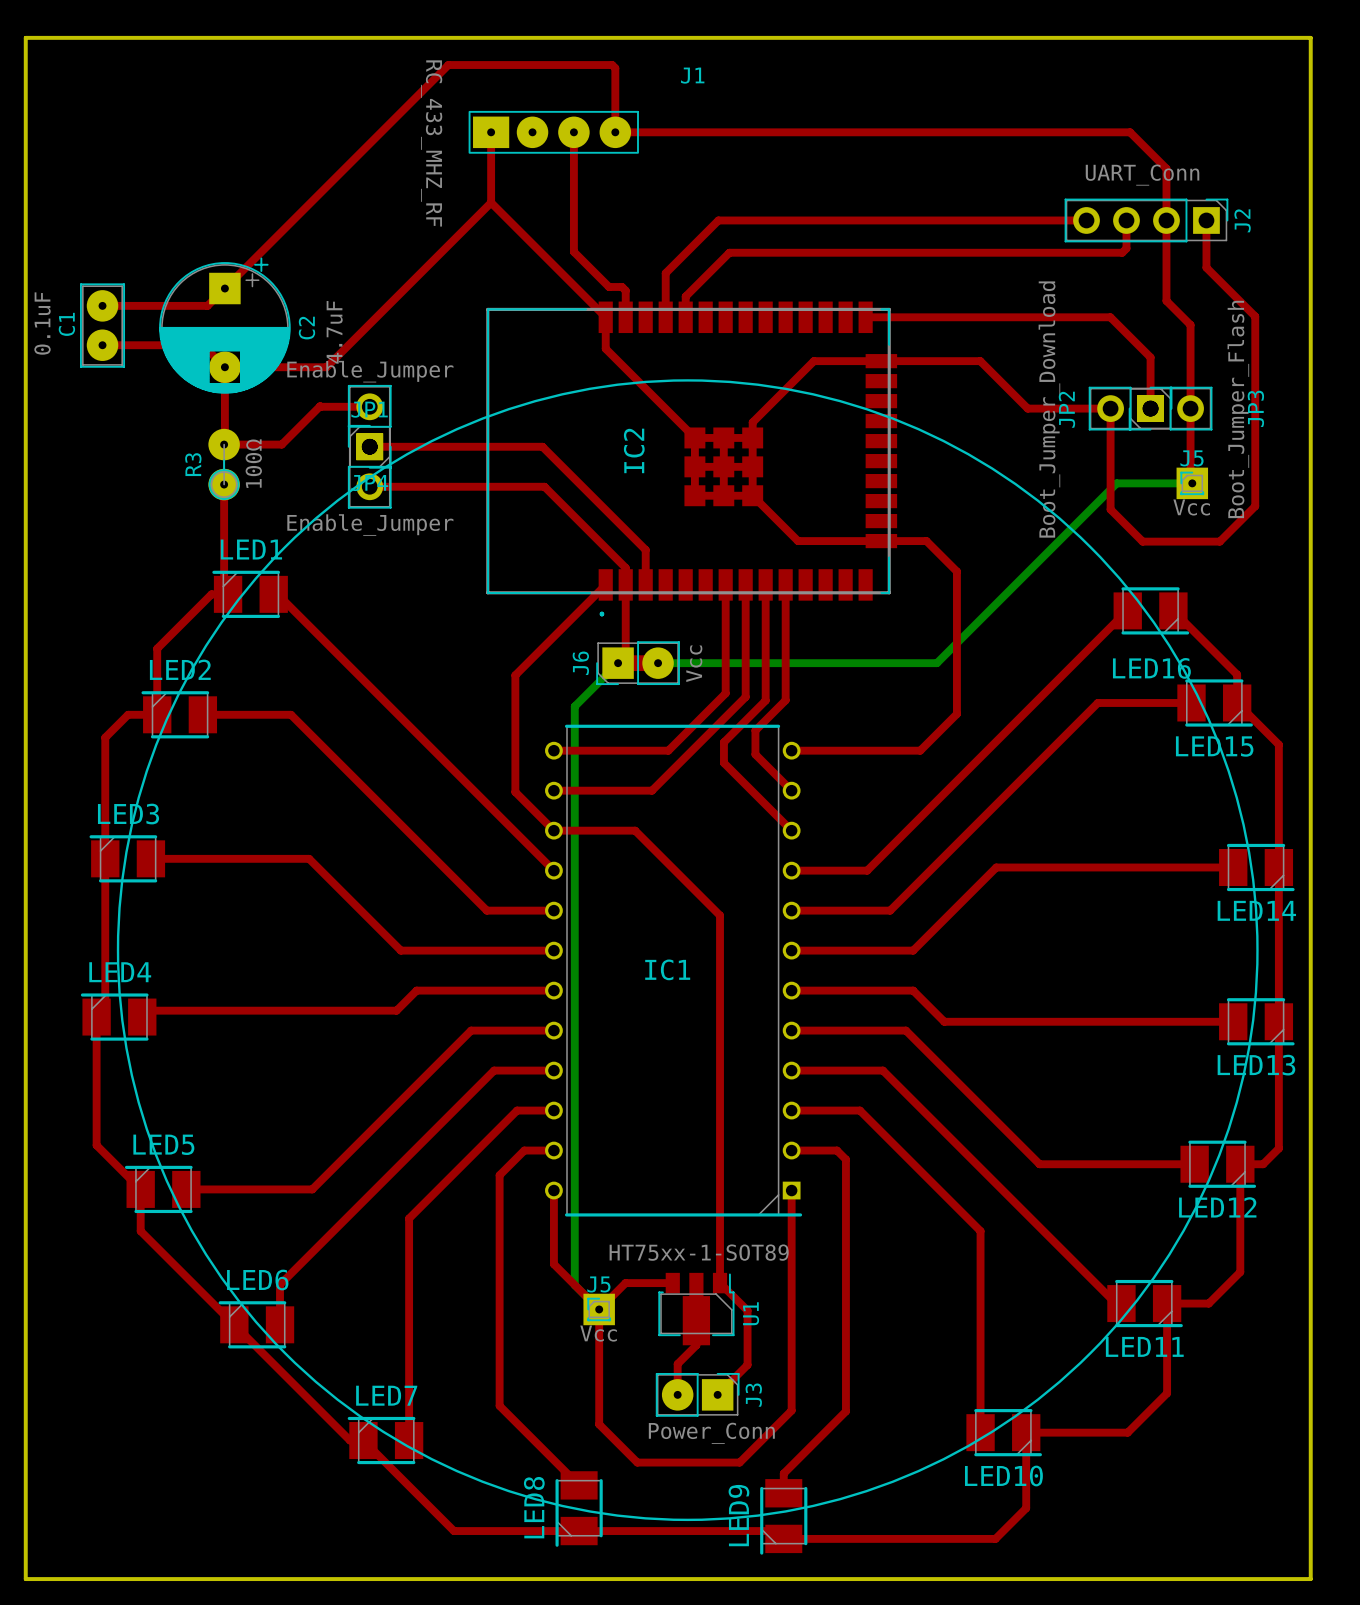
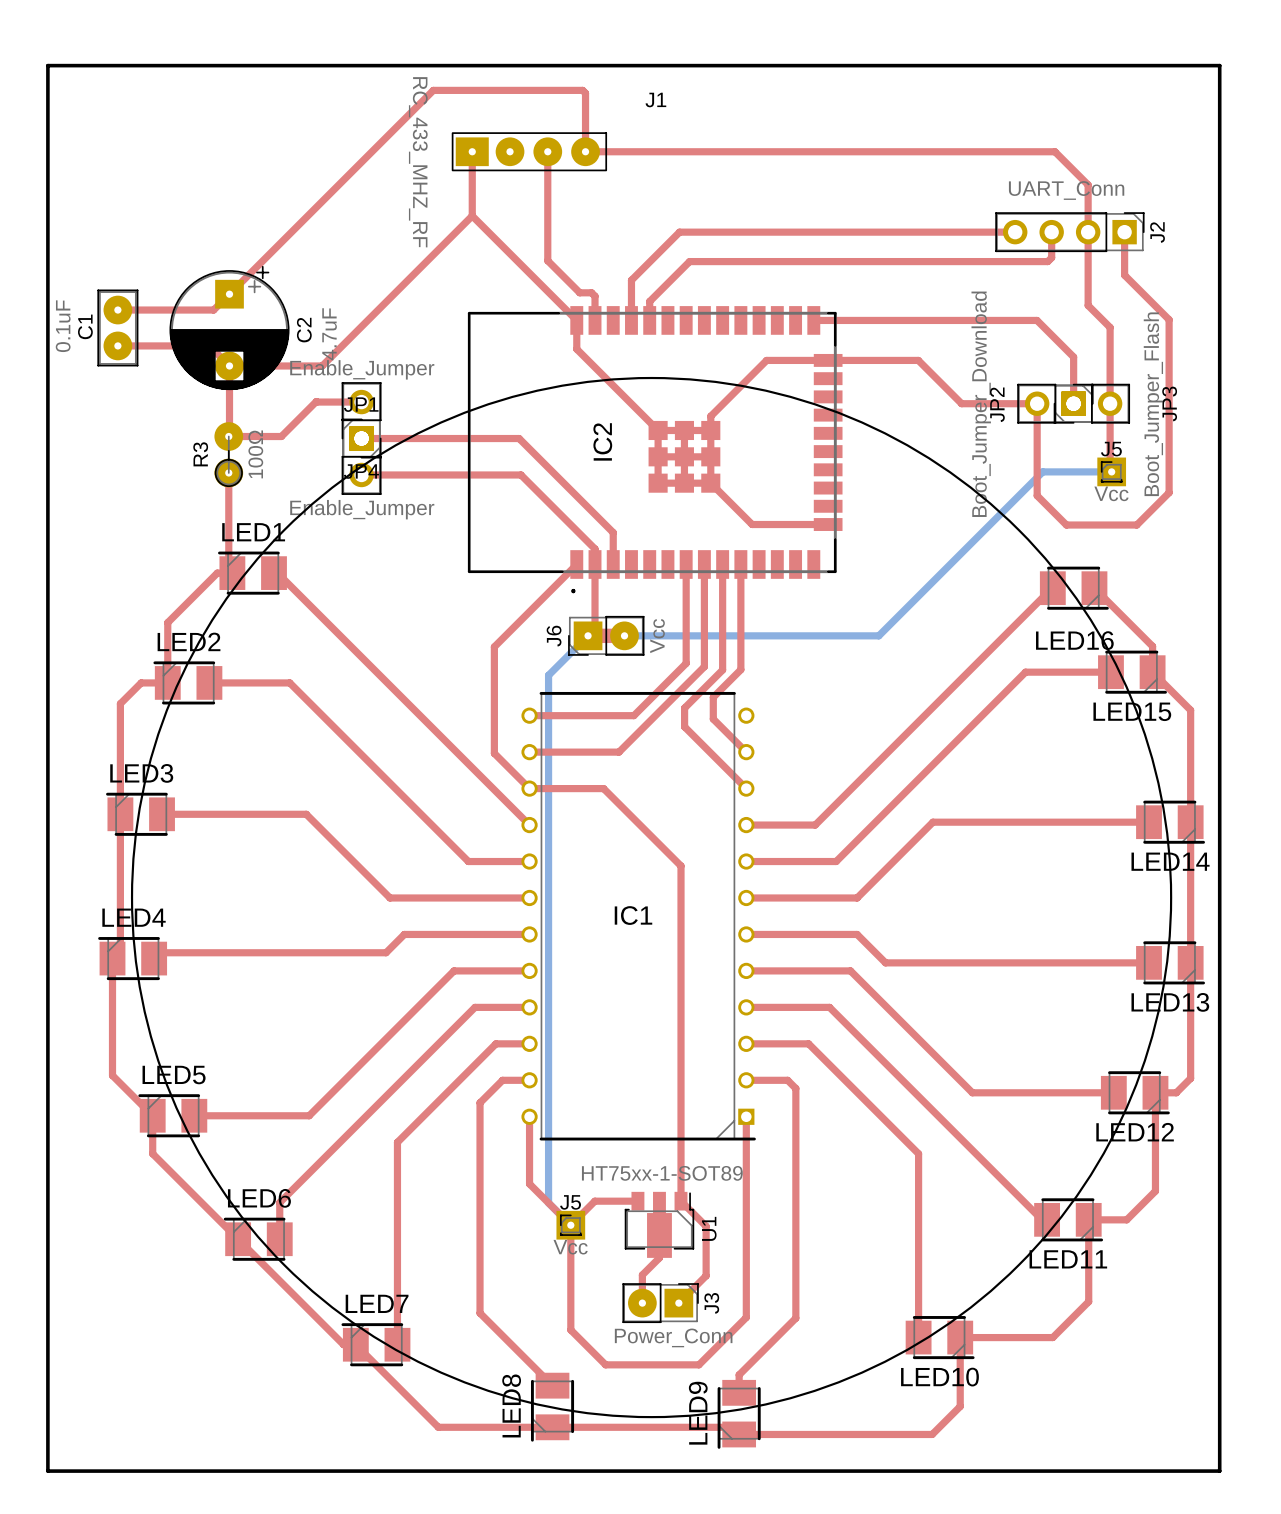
top track: (881, 541) (926, 541) (956, 571) (956, 714) (920, 750) (791, 750) -> none

